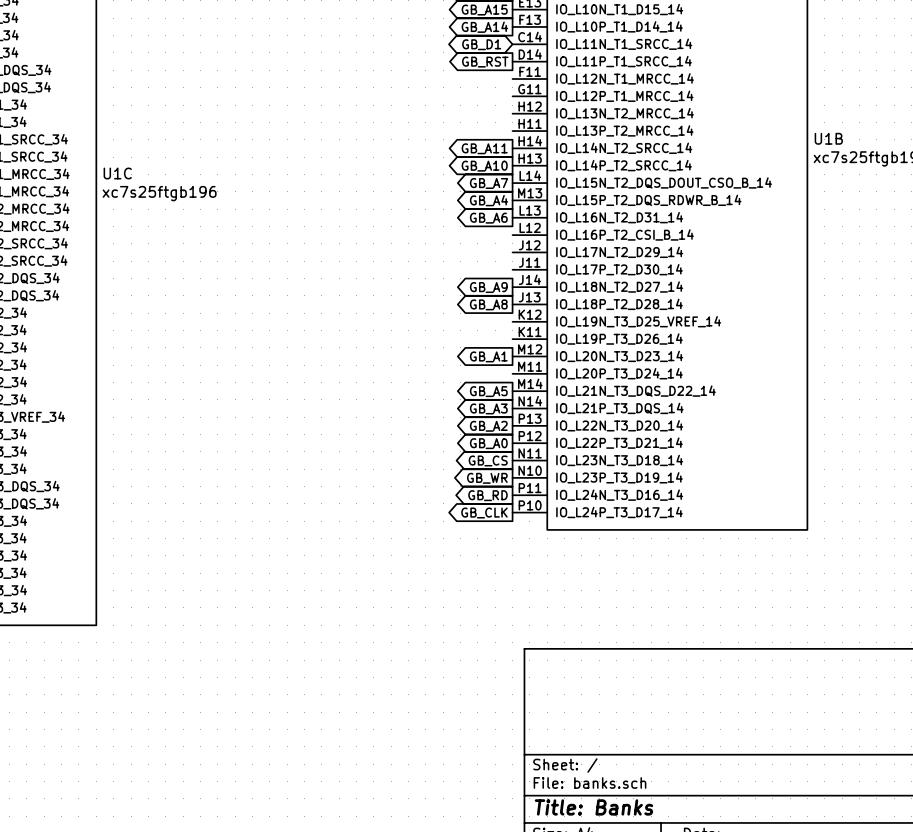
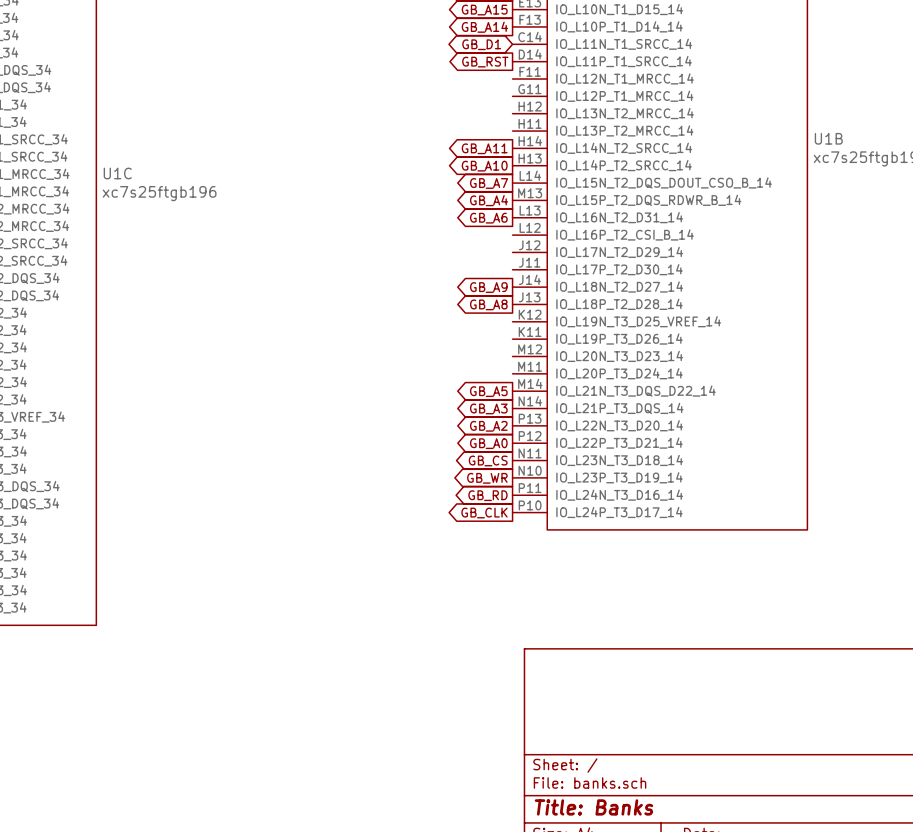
global label: GB_A1 (488, 356) -> none

